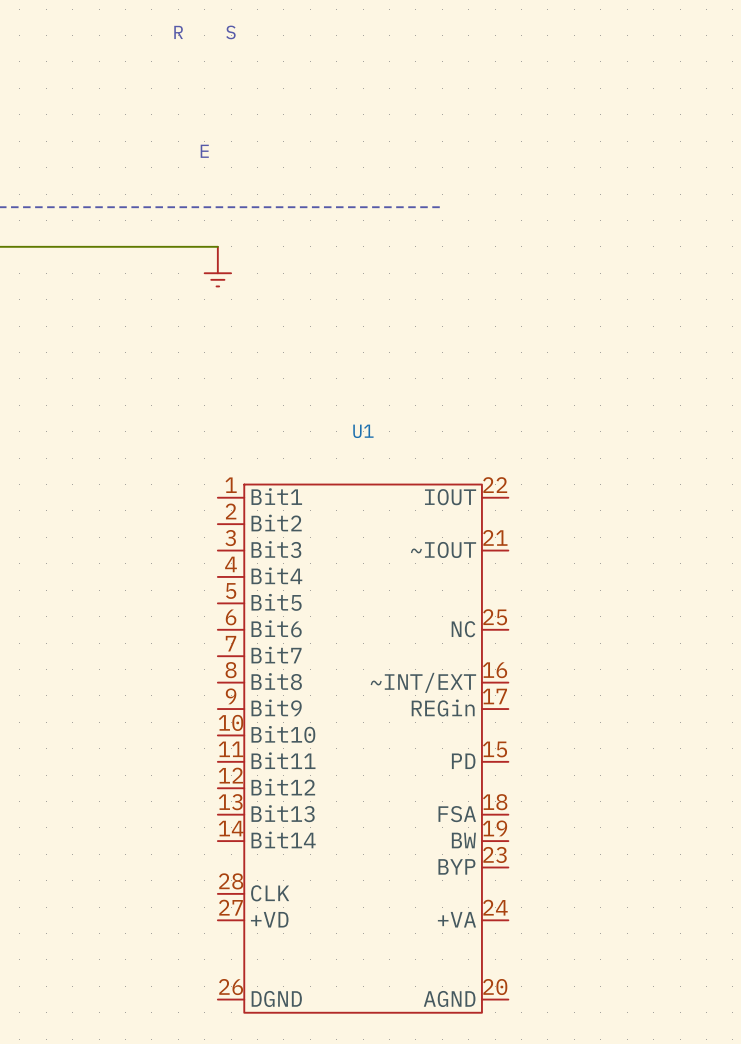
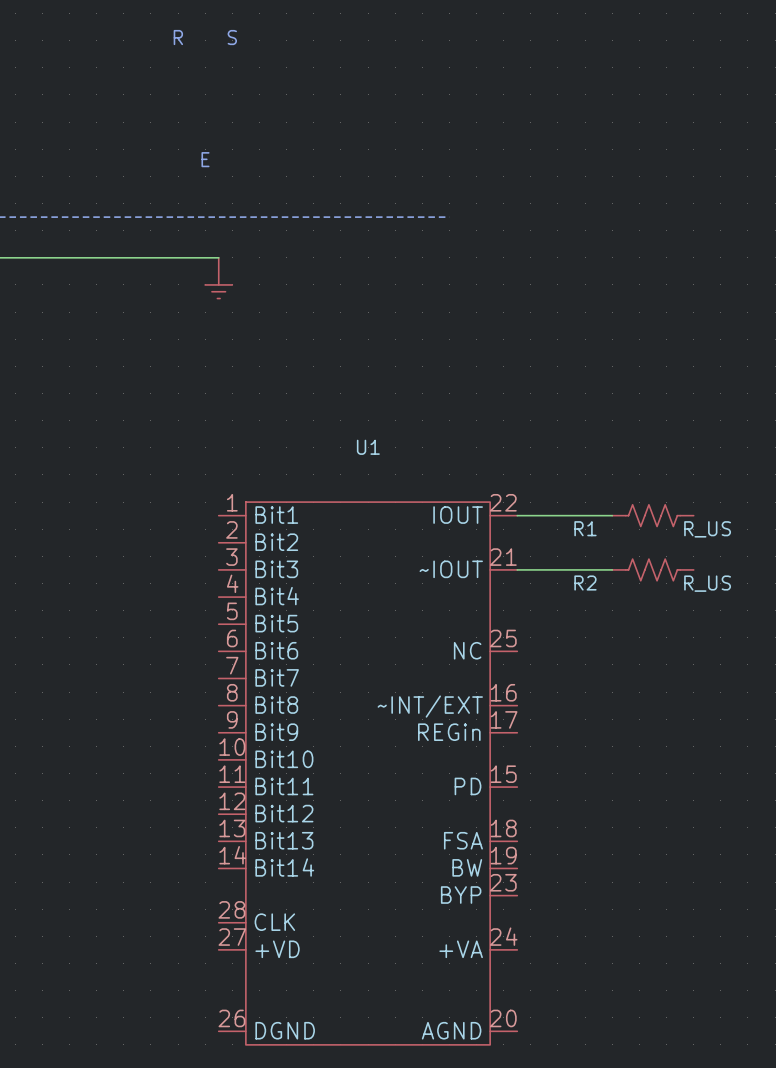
wire: none -> (517, 515) (612, 515)
R1: none -> R_US (652, 515)
wire: none -> (517, 569) (612, 569)
R2: none -> R_US (652, 569)

